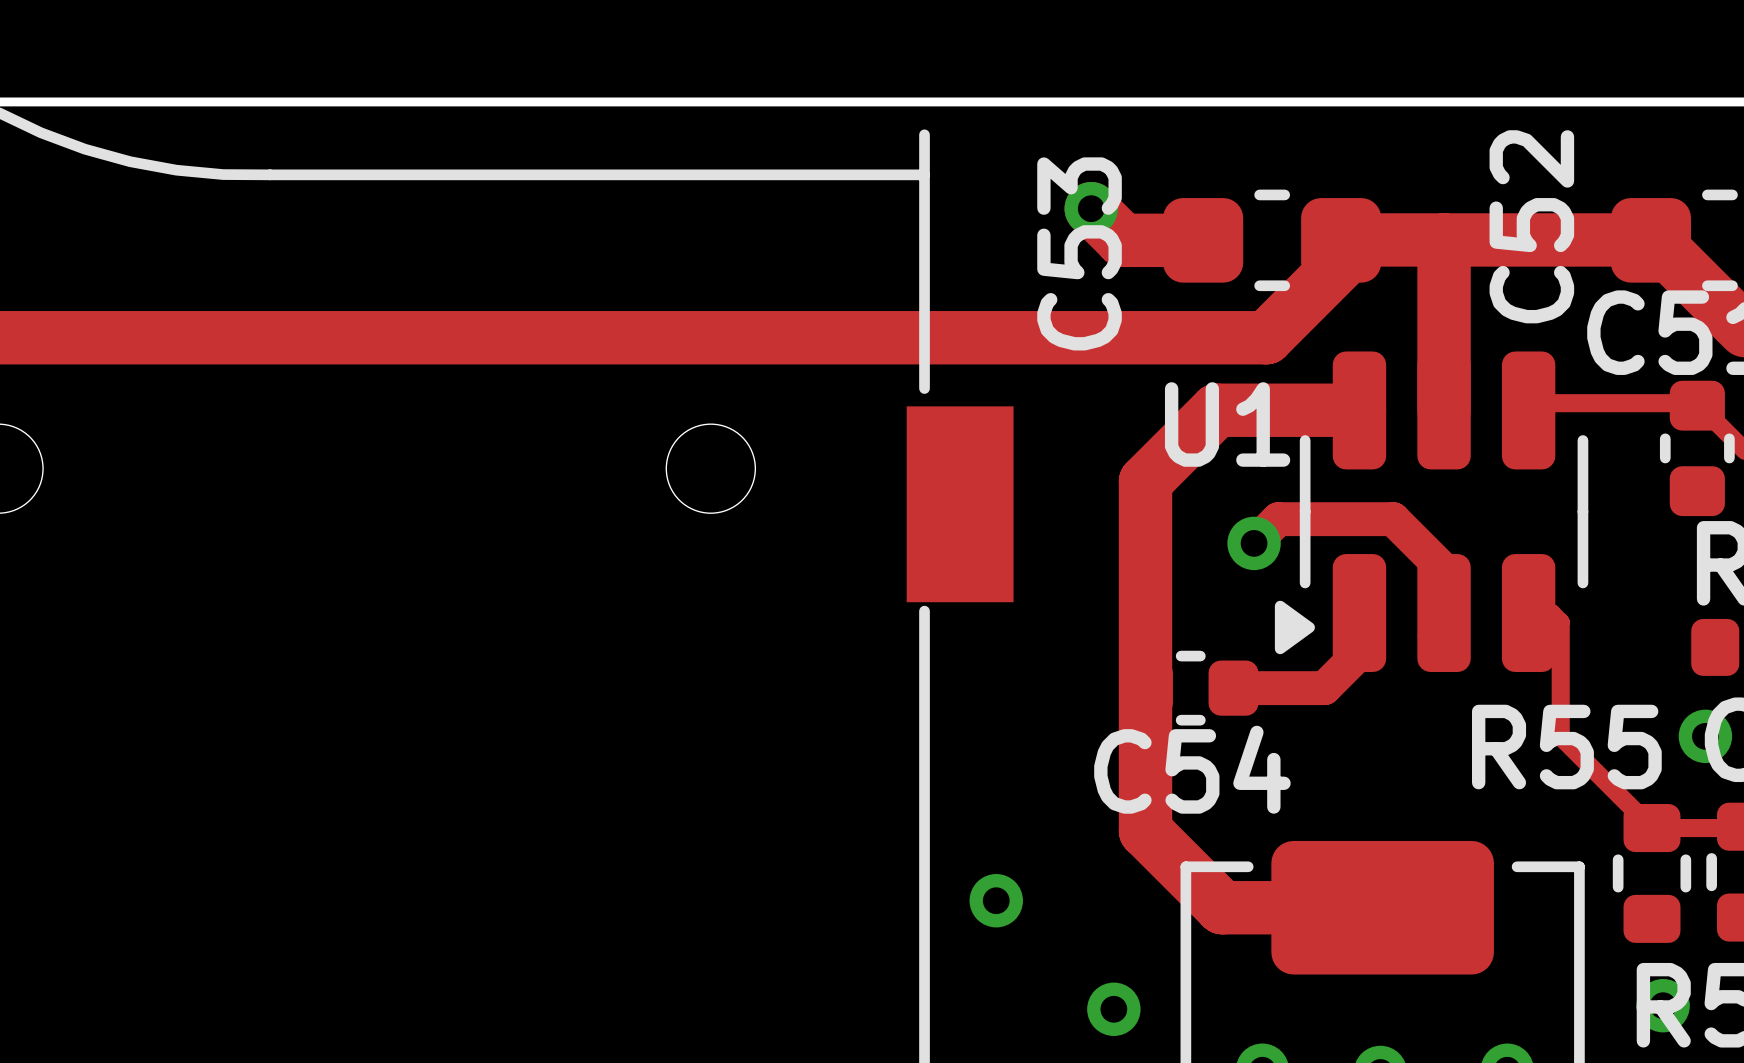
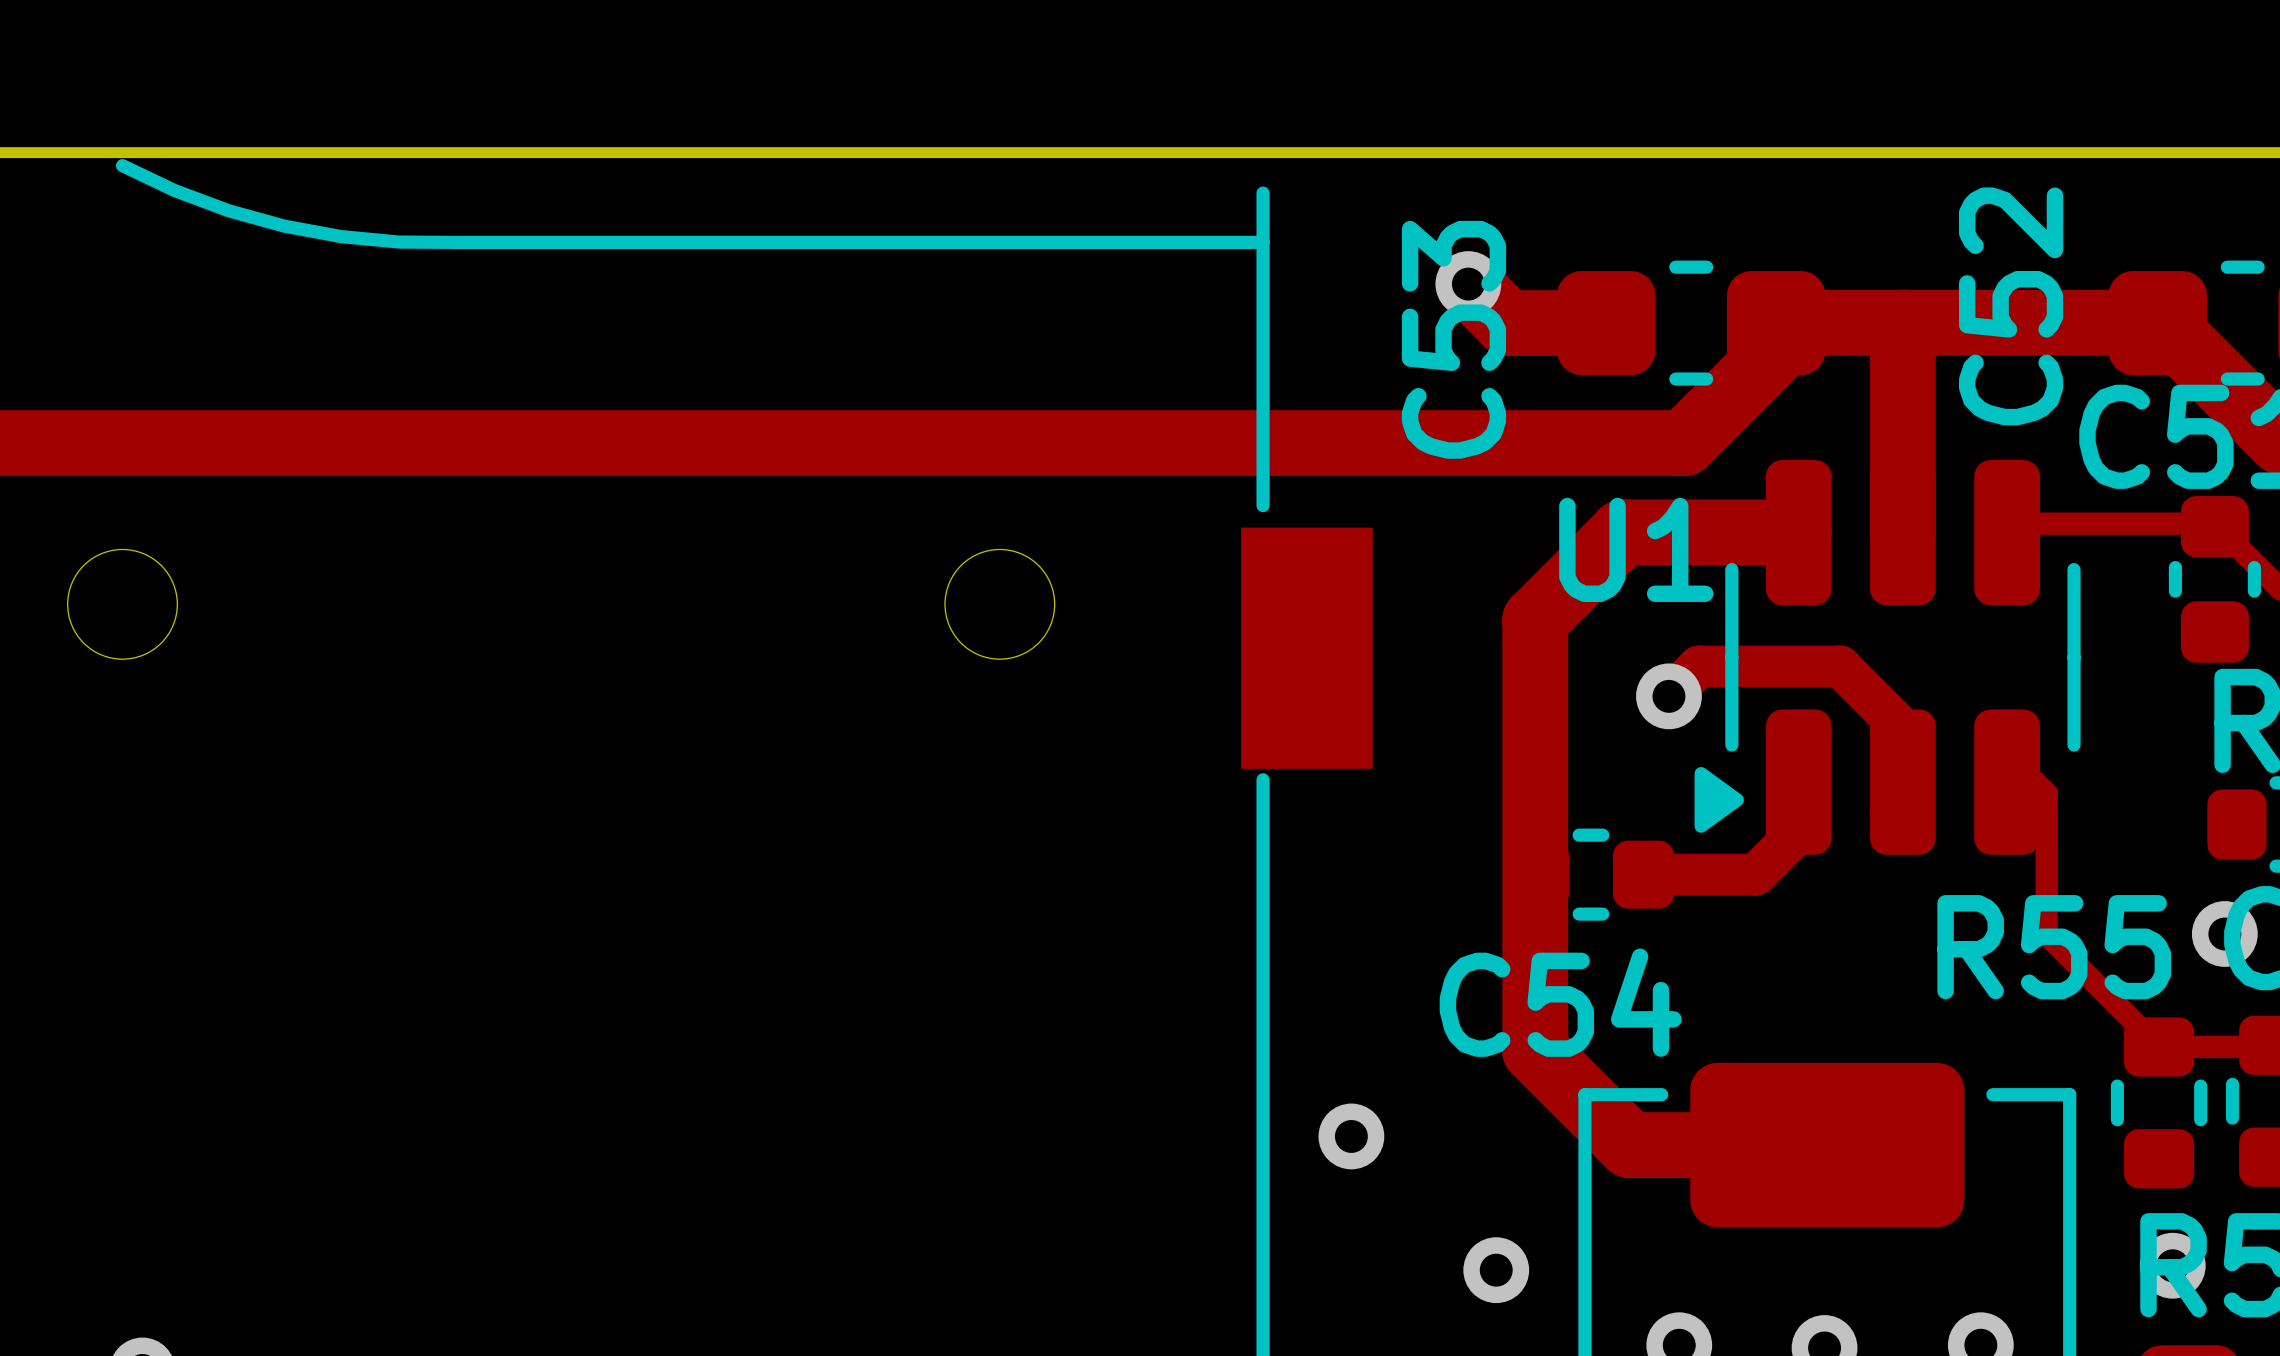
C54 name position: C54 (1192, 769) -> C54 (1560, 1002)

